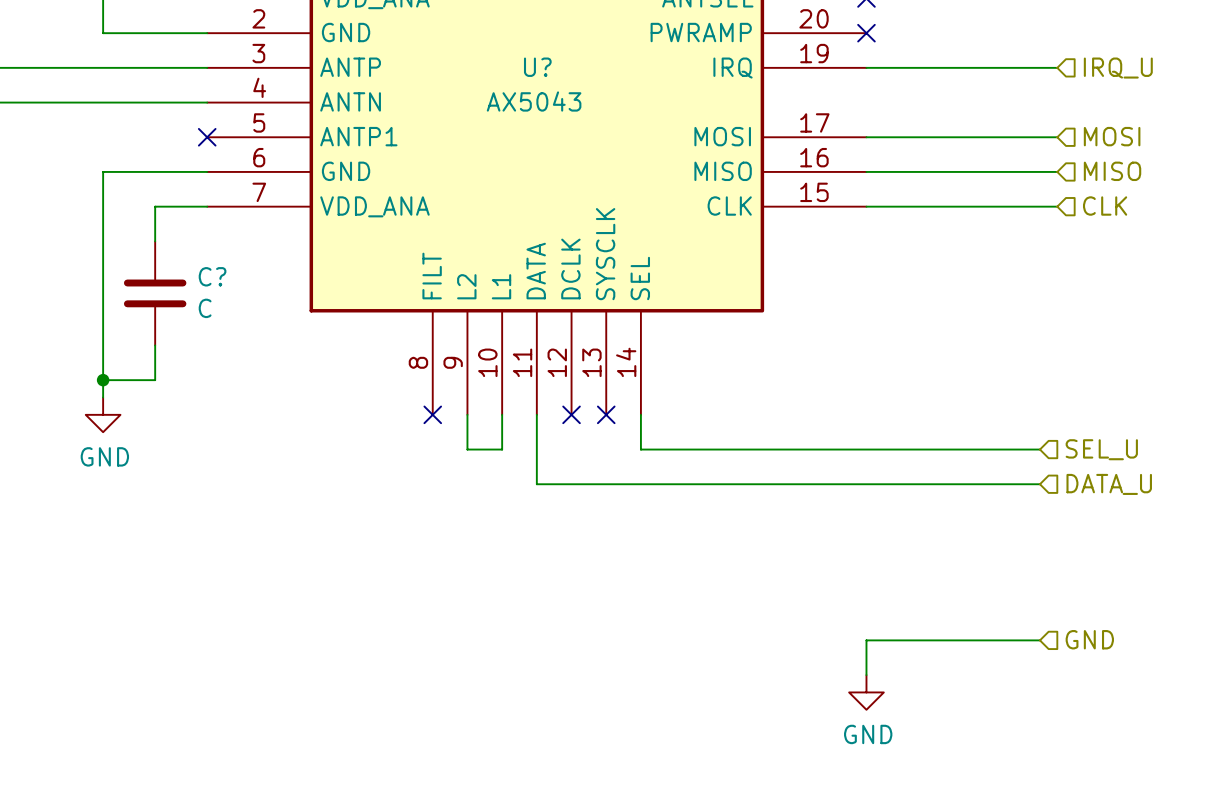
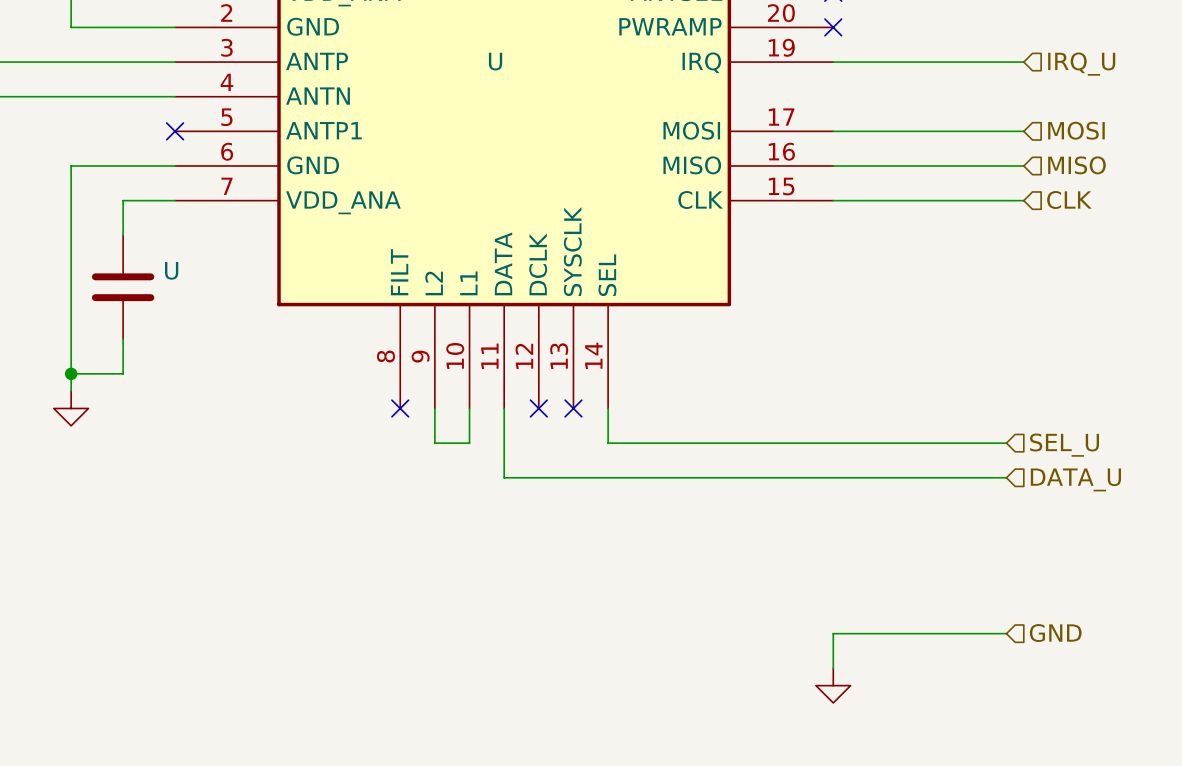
U? name: U? (537, 67) -> U (495, 61)
U? value: AX5043 (534, 101) -> none
C? name: C? (212, 276) -> U (171, 270)
C? value: C (205, 308) -> none
power symbol text: GND (104, 456) -> none
power symbol text: GND (868, 734) -> none

